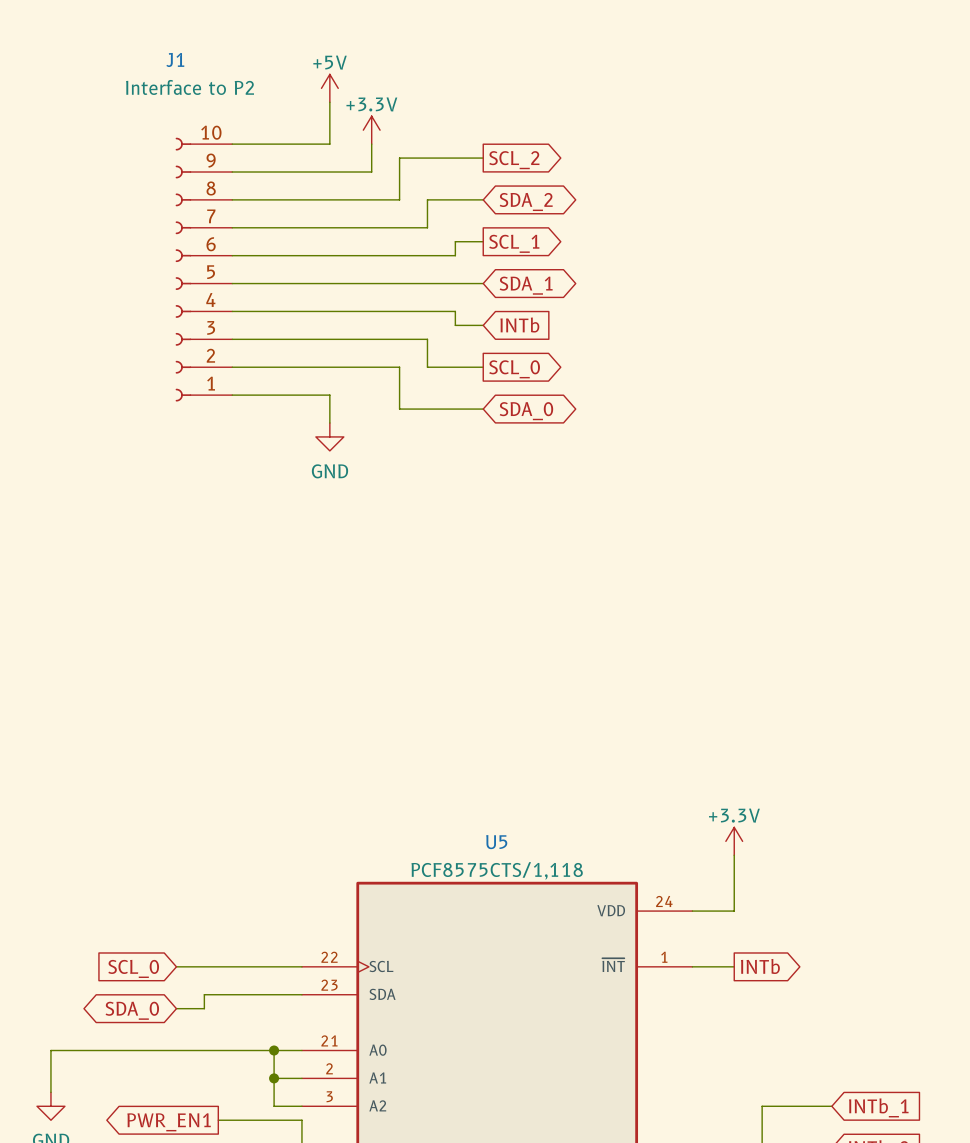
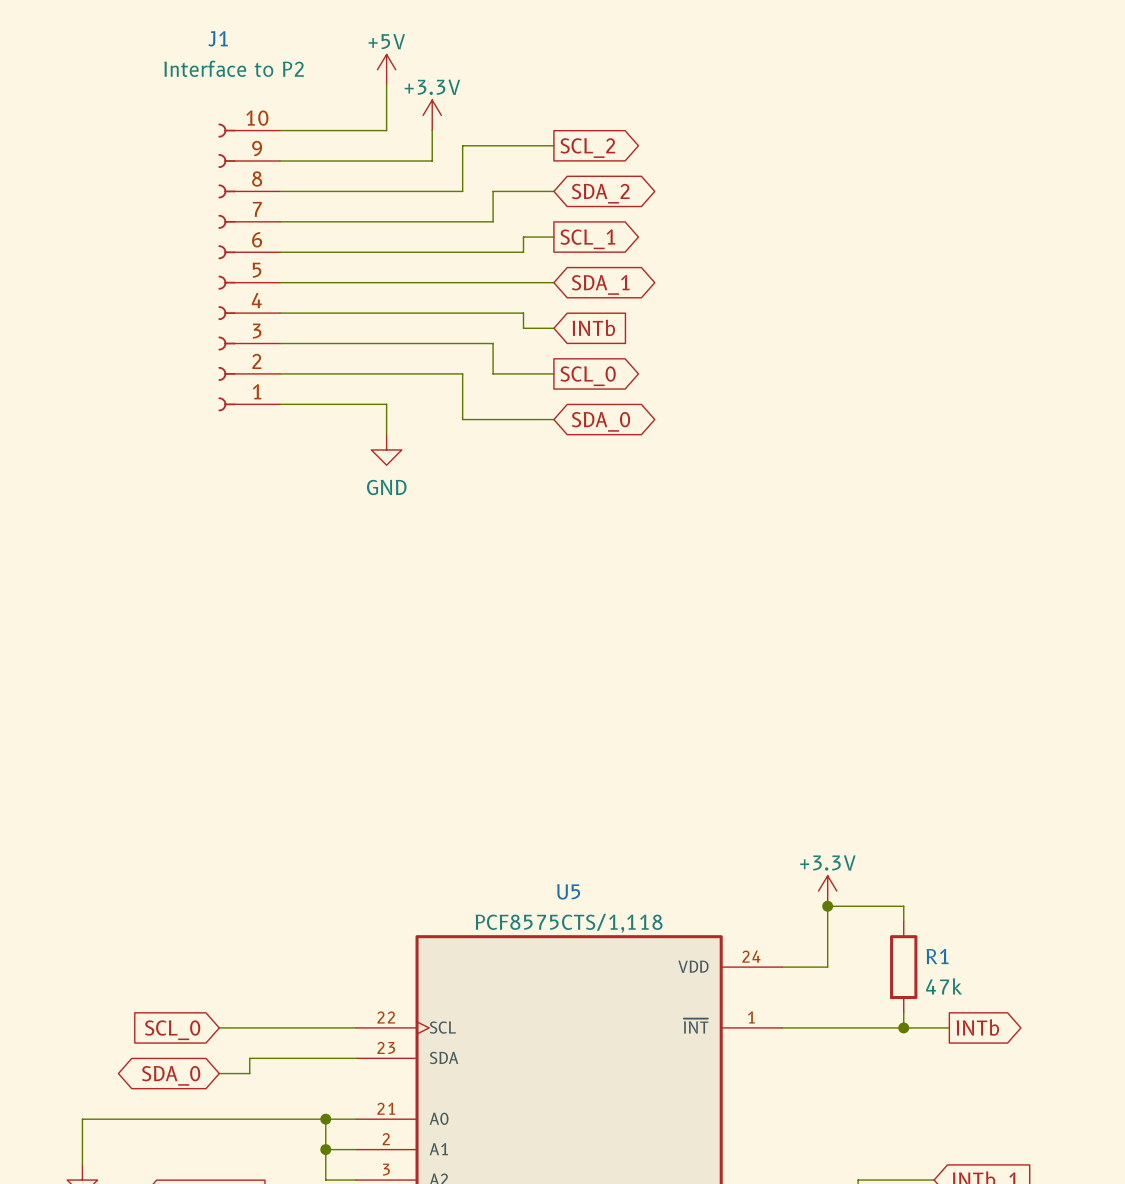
wire: none -> (827, 906) (903, 906) (903, 921)
junction: none -> (827, 906)
R1: none -> 47k (903, 967)
wire: none -> (903, 1012) (903, 1027)
wire: none -> (827, 1027) (949, 1027)
global label position: INTb (760, 966) -> INTb (977, 1027)
junction: none -> (903, 1027)

